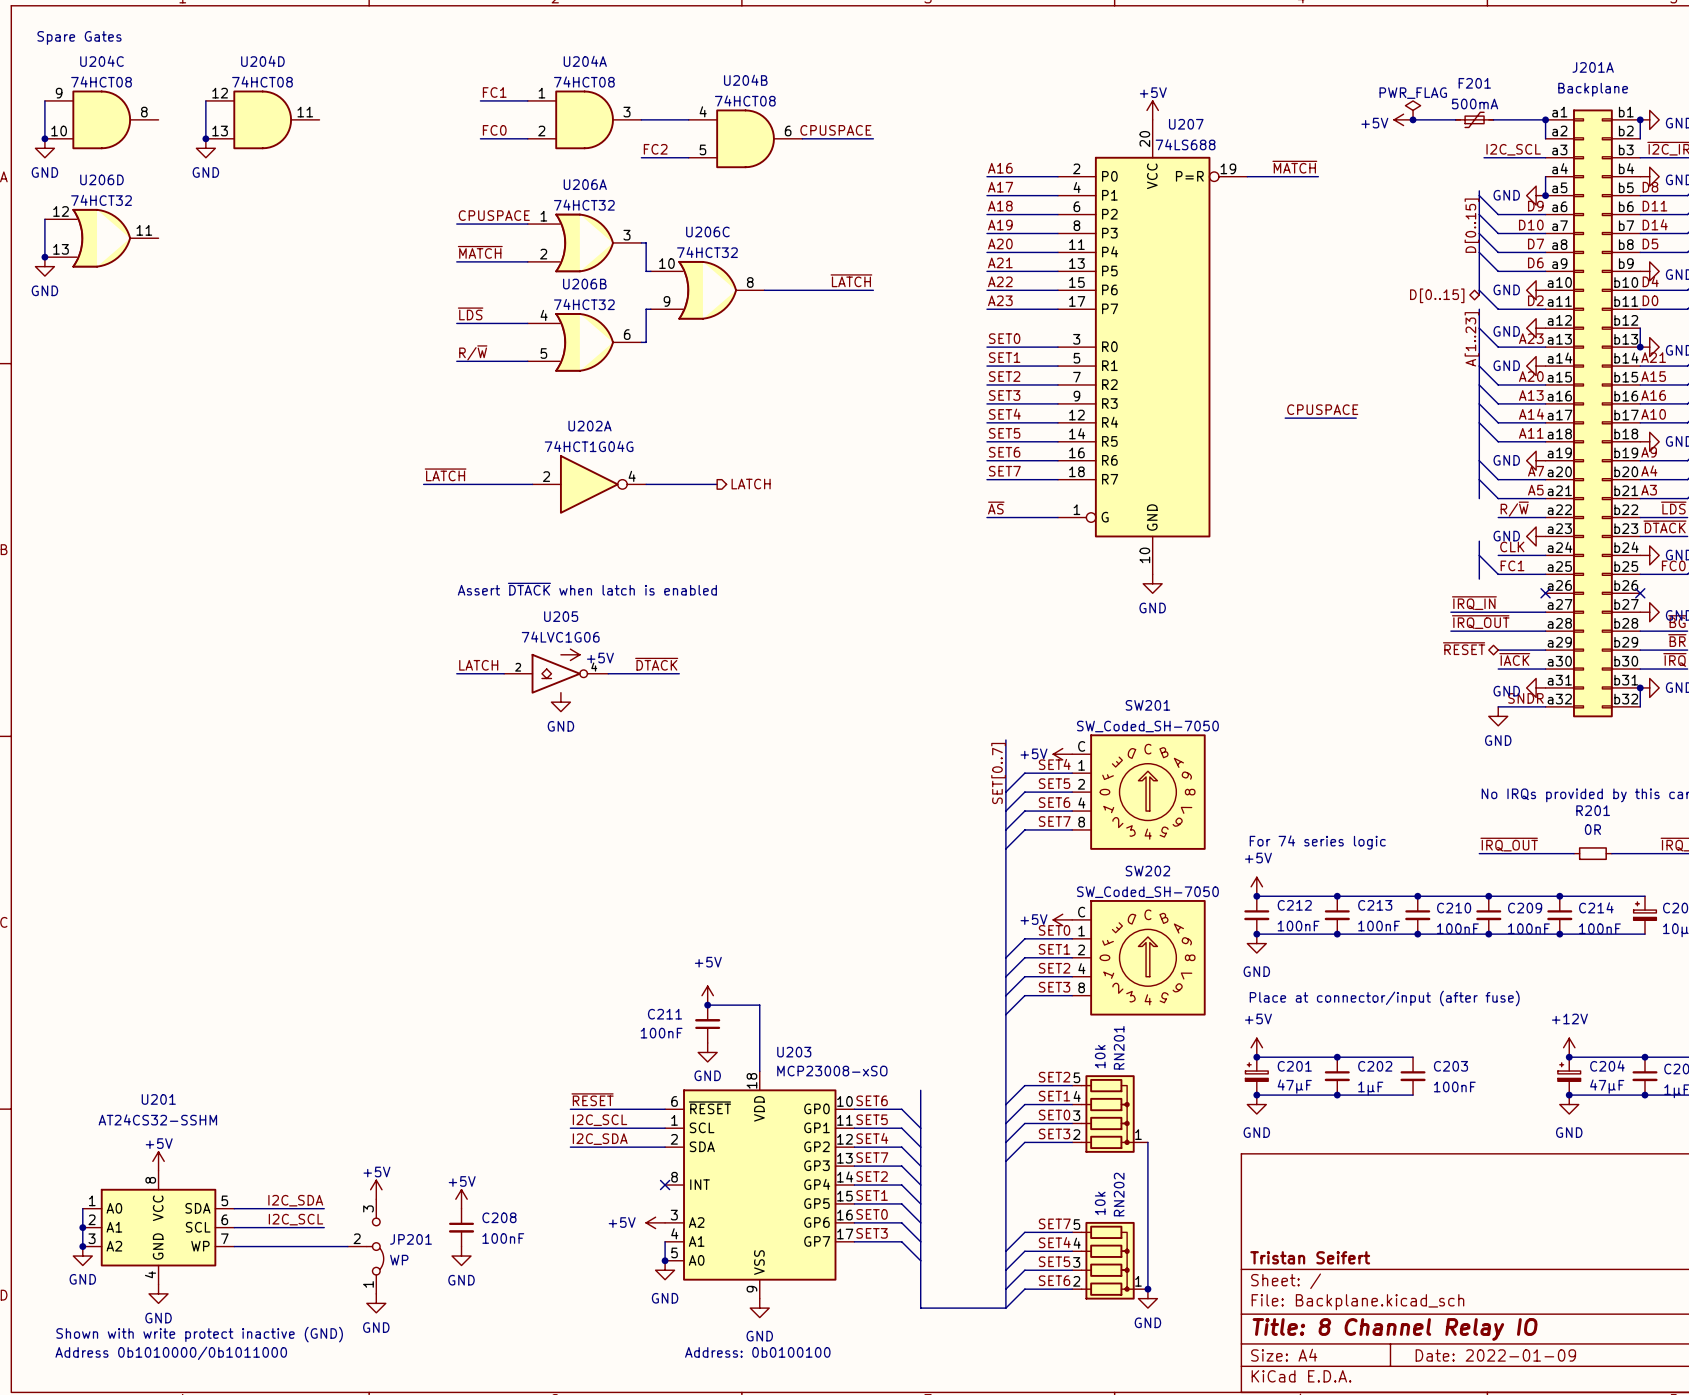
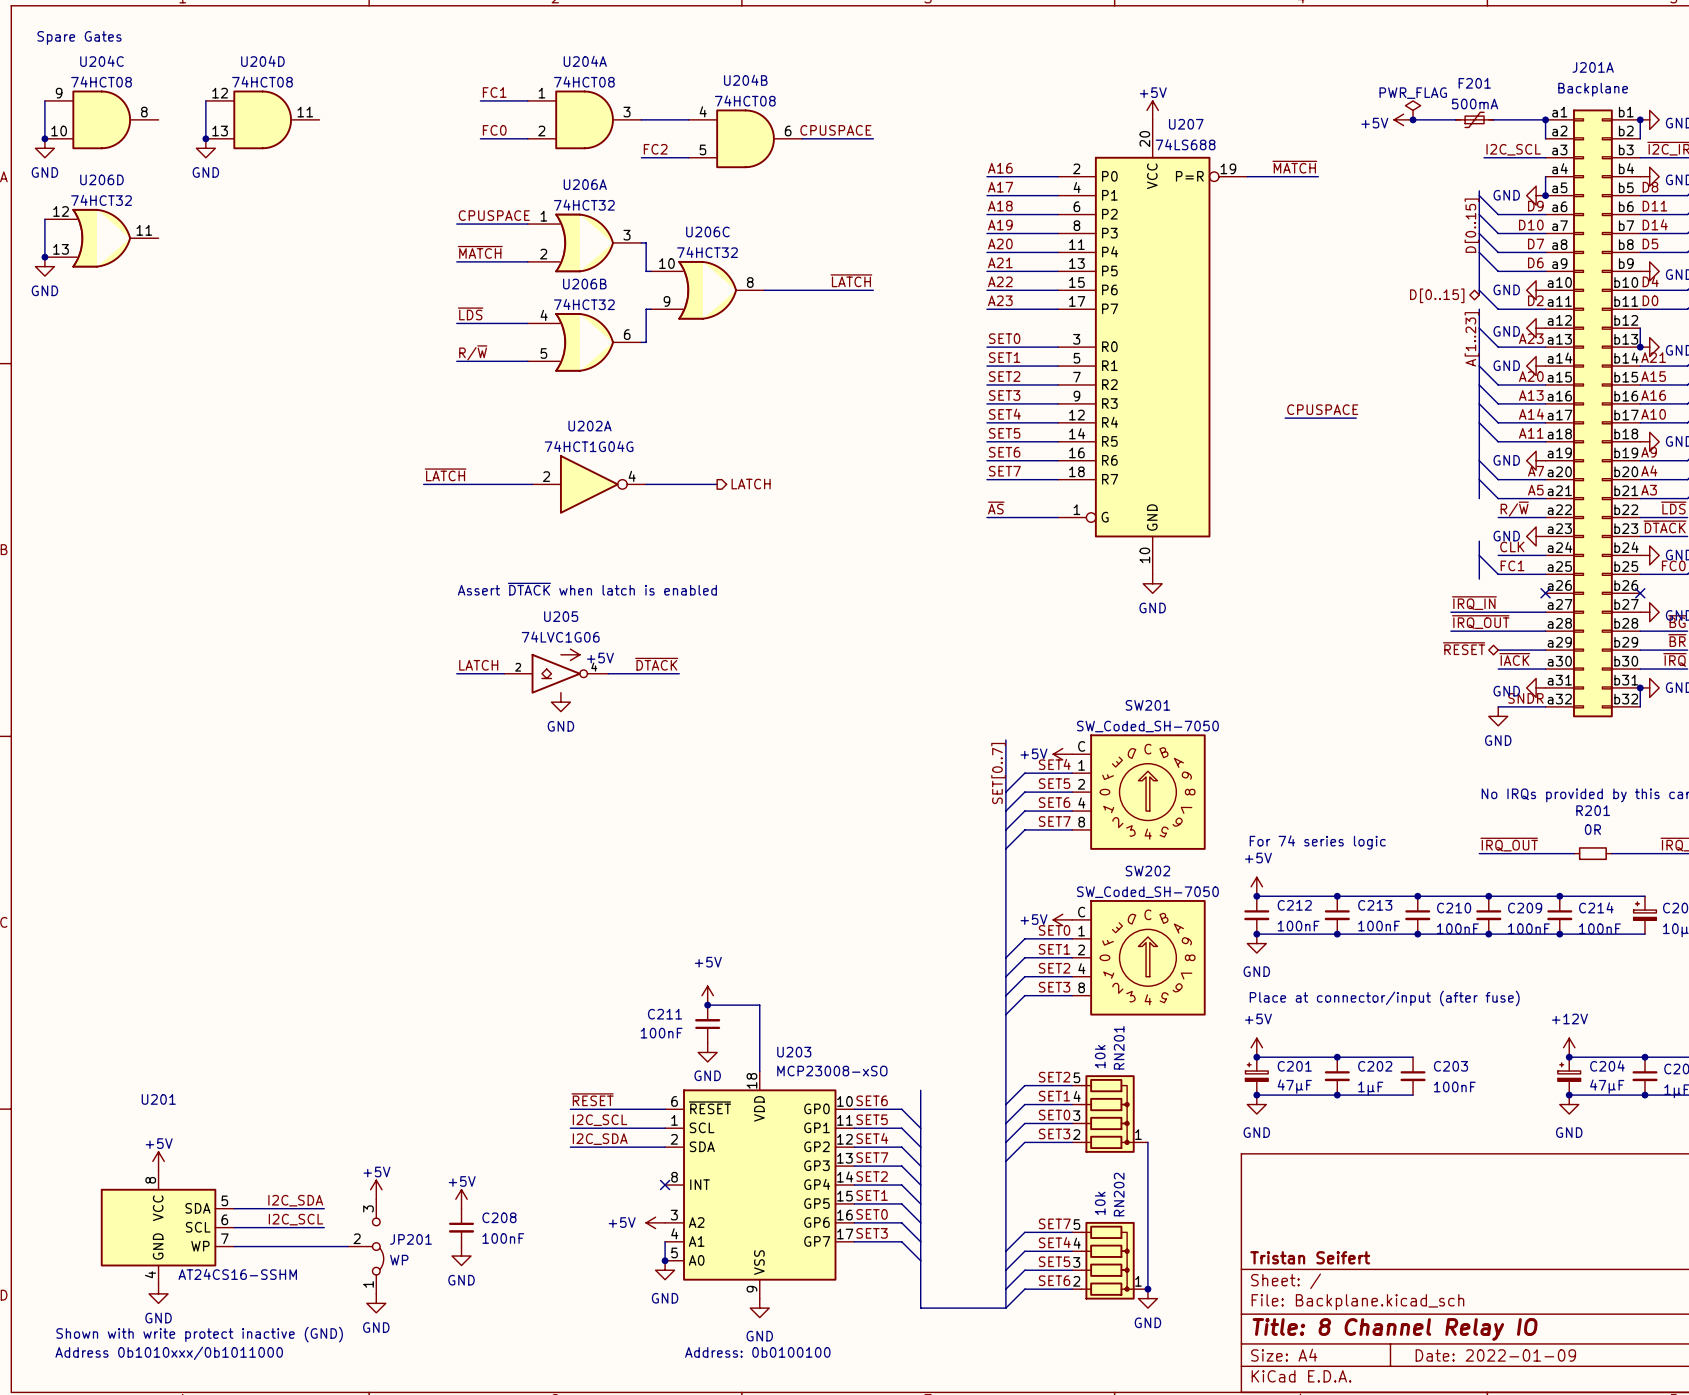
U201 value: AT24CS32-SSHM (157, 1119) -> AT24CS16-SSHM (237, 1274)
U201 symbol: [82, 1170, 235, 1285] -> [100, 1170, 235, 1285]
wire: (82, 1208) (82, 1246) -> none
junction: (82, 1227) -> none
junction: (82, 1246) -> none
power symbol: GND (82, 1256) -> none
text: Address 0b1010000/0b1011000 (171, 1353) -> Address 0b1010xxx/0b1011000 (169, 1353)

